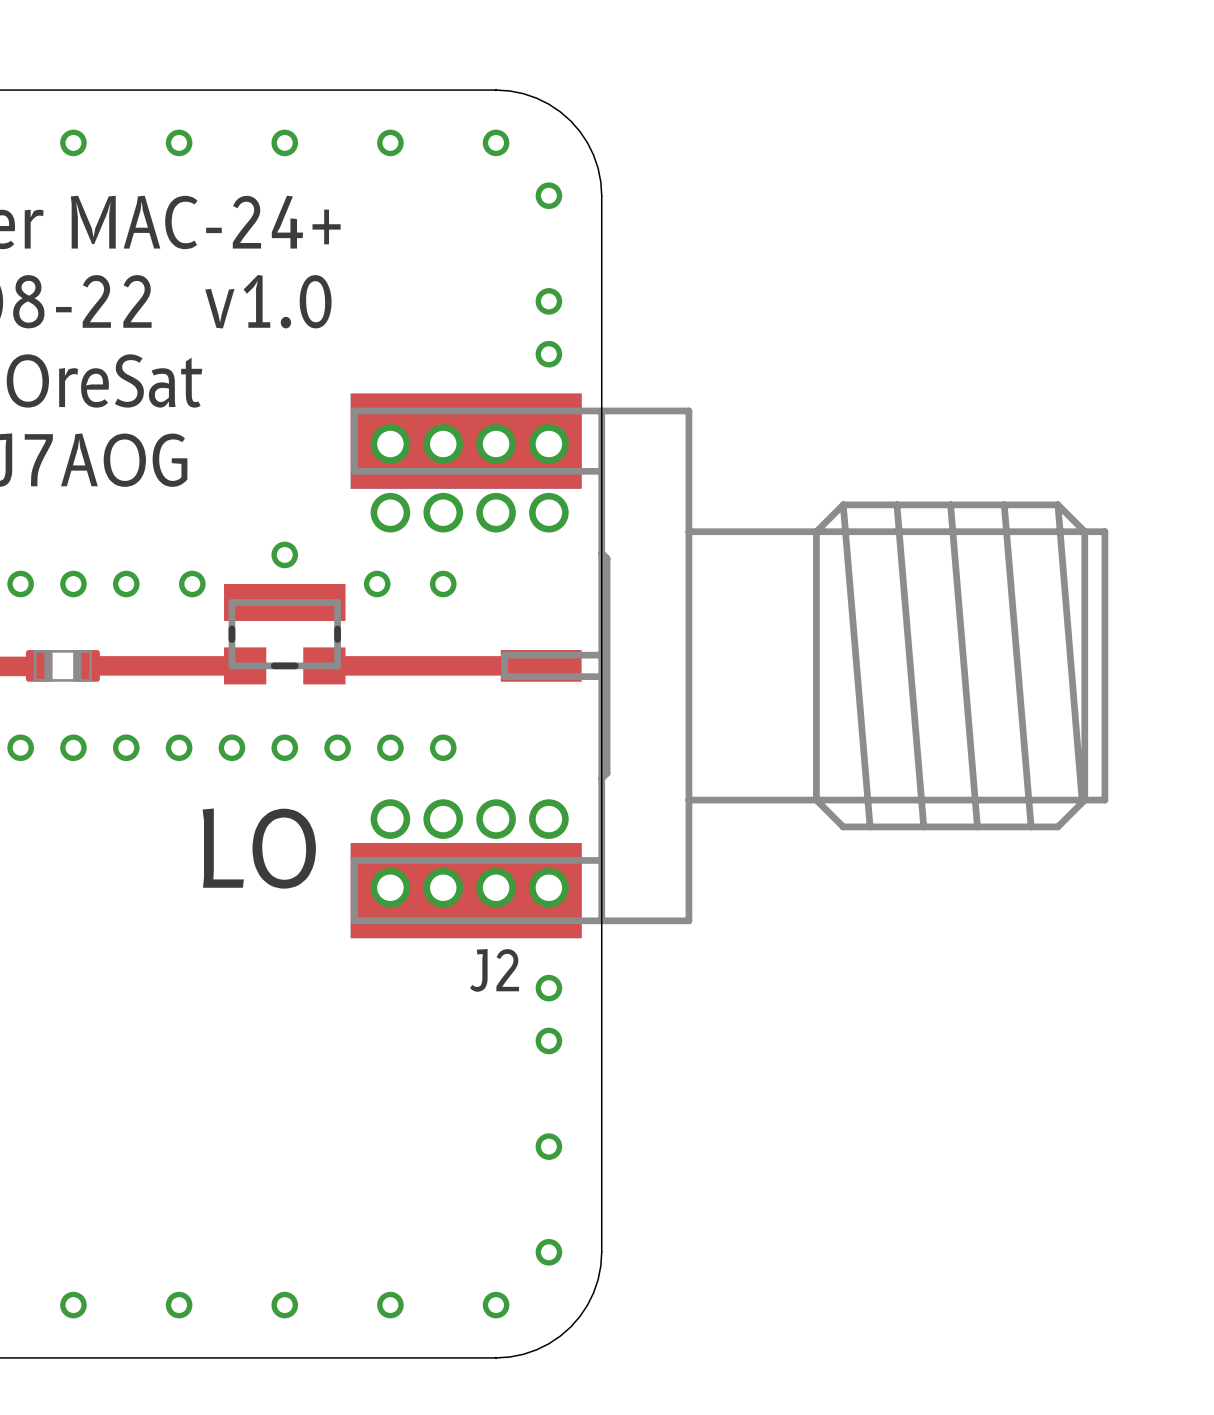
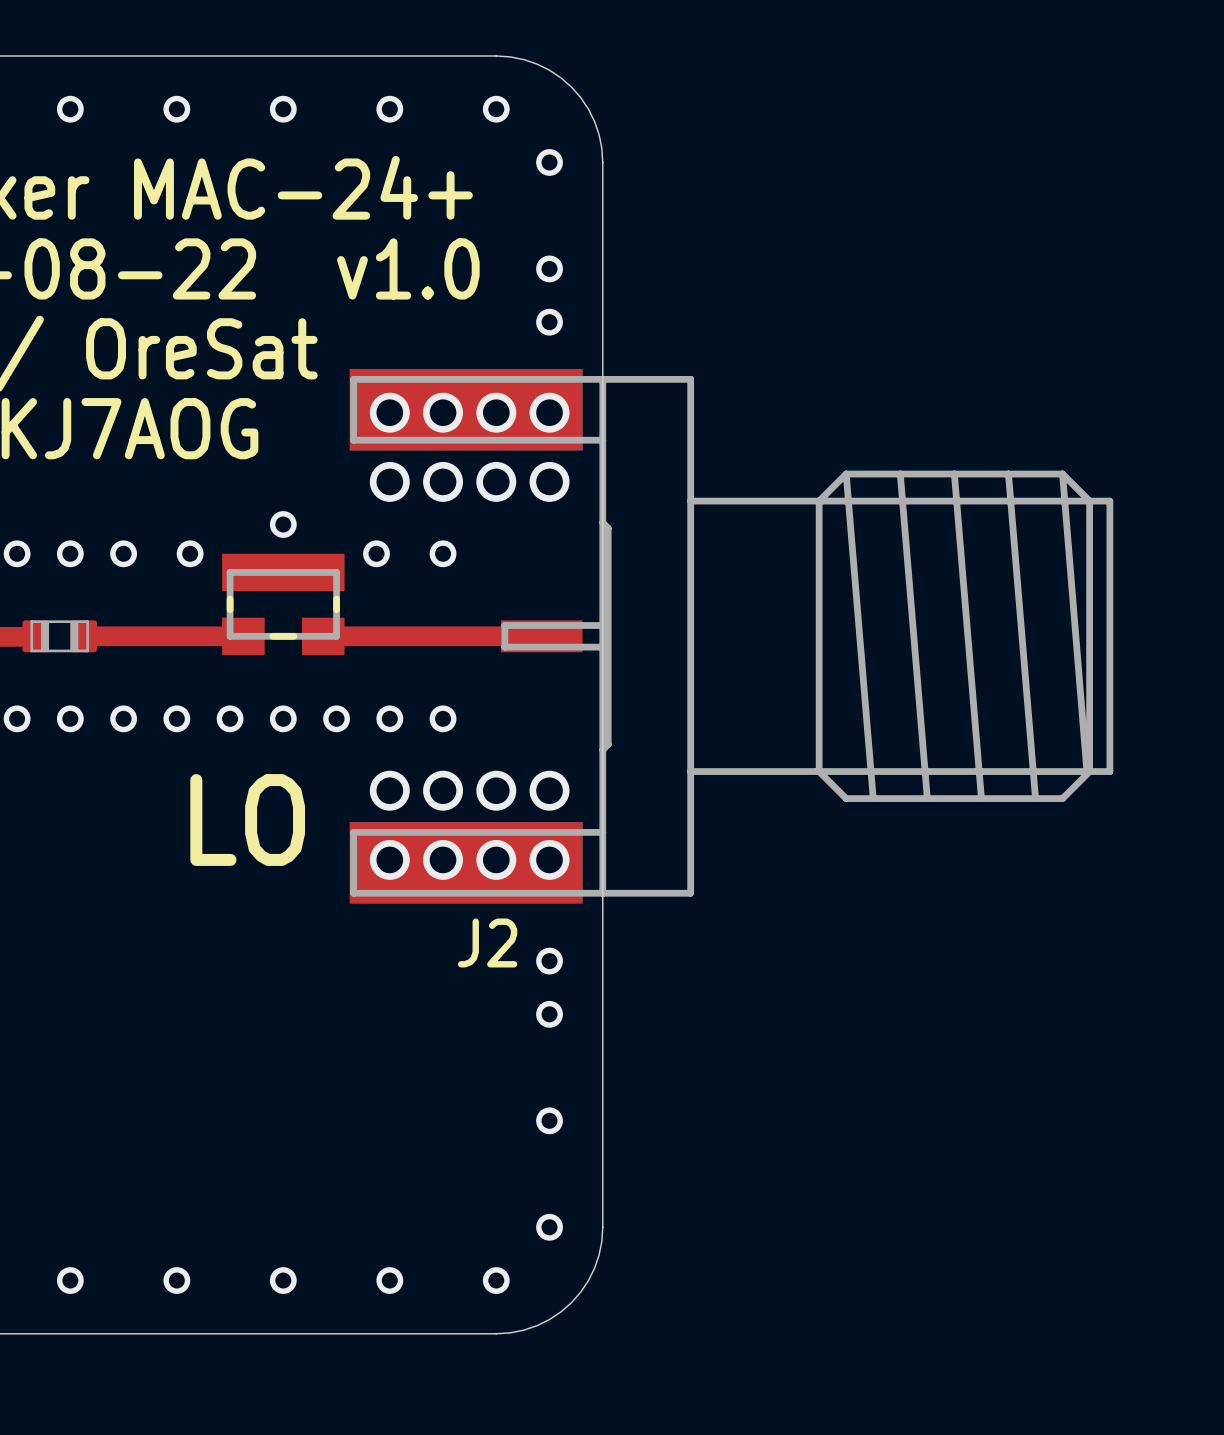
J2 footprint: [350, 393, 1109, 939] -> [349, 369, 1114, 904]

